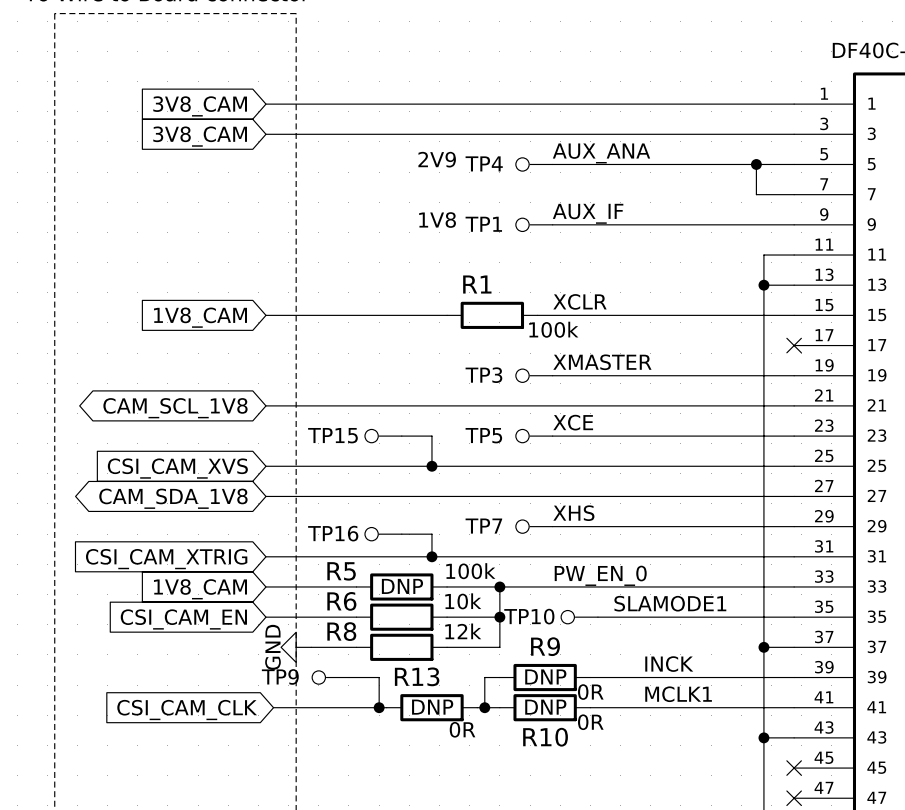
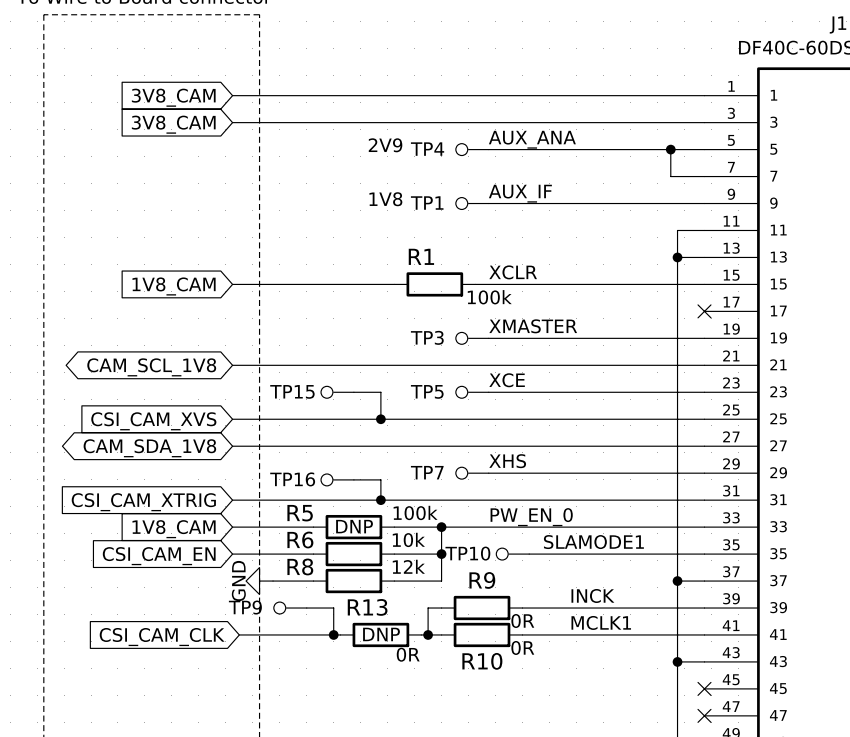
R9 text: DNP (545, 676) -> none
R10 text: DNP (545, 707) -> none

